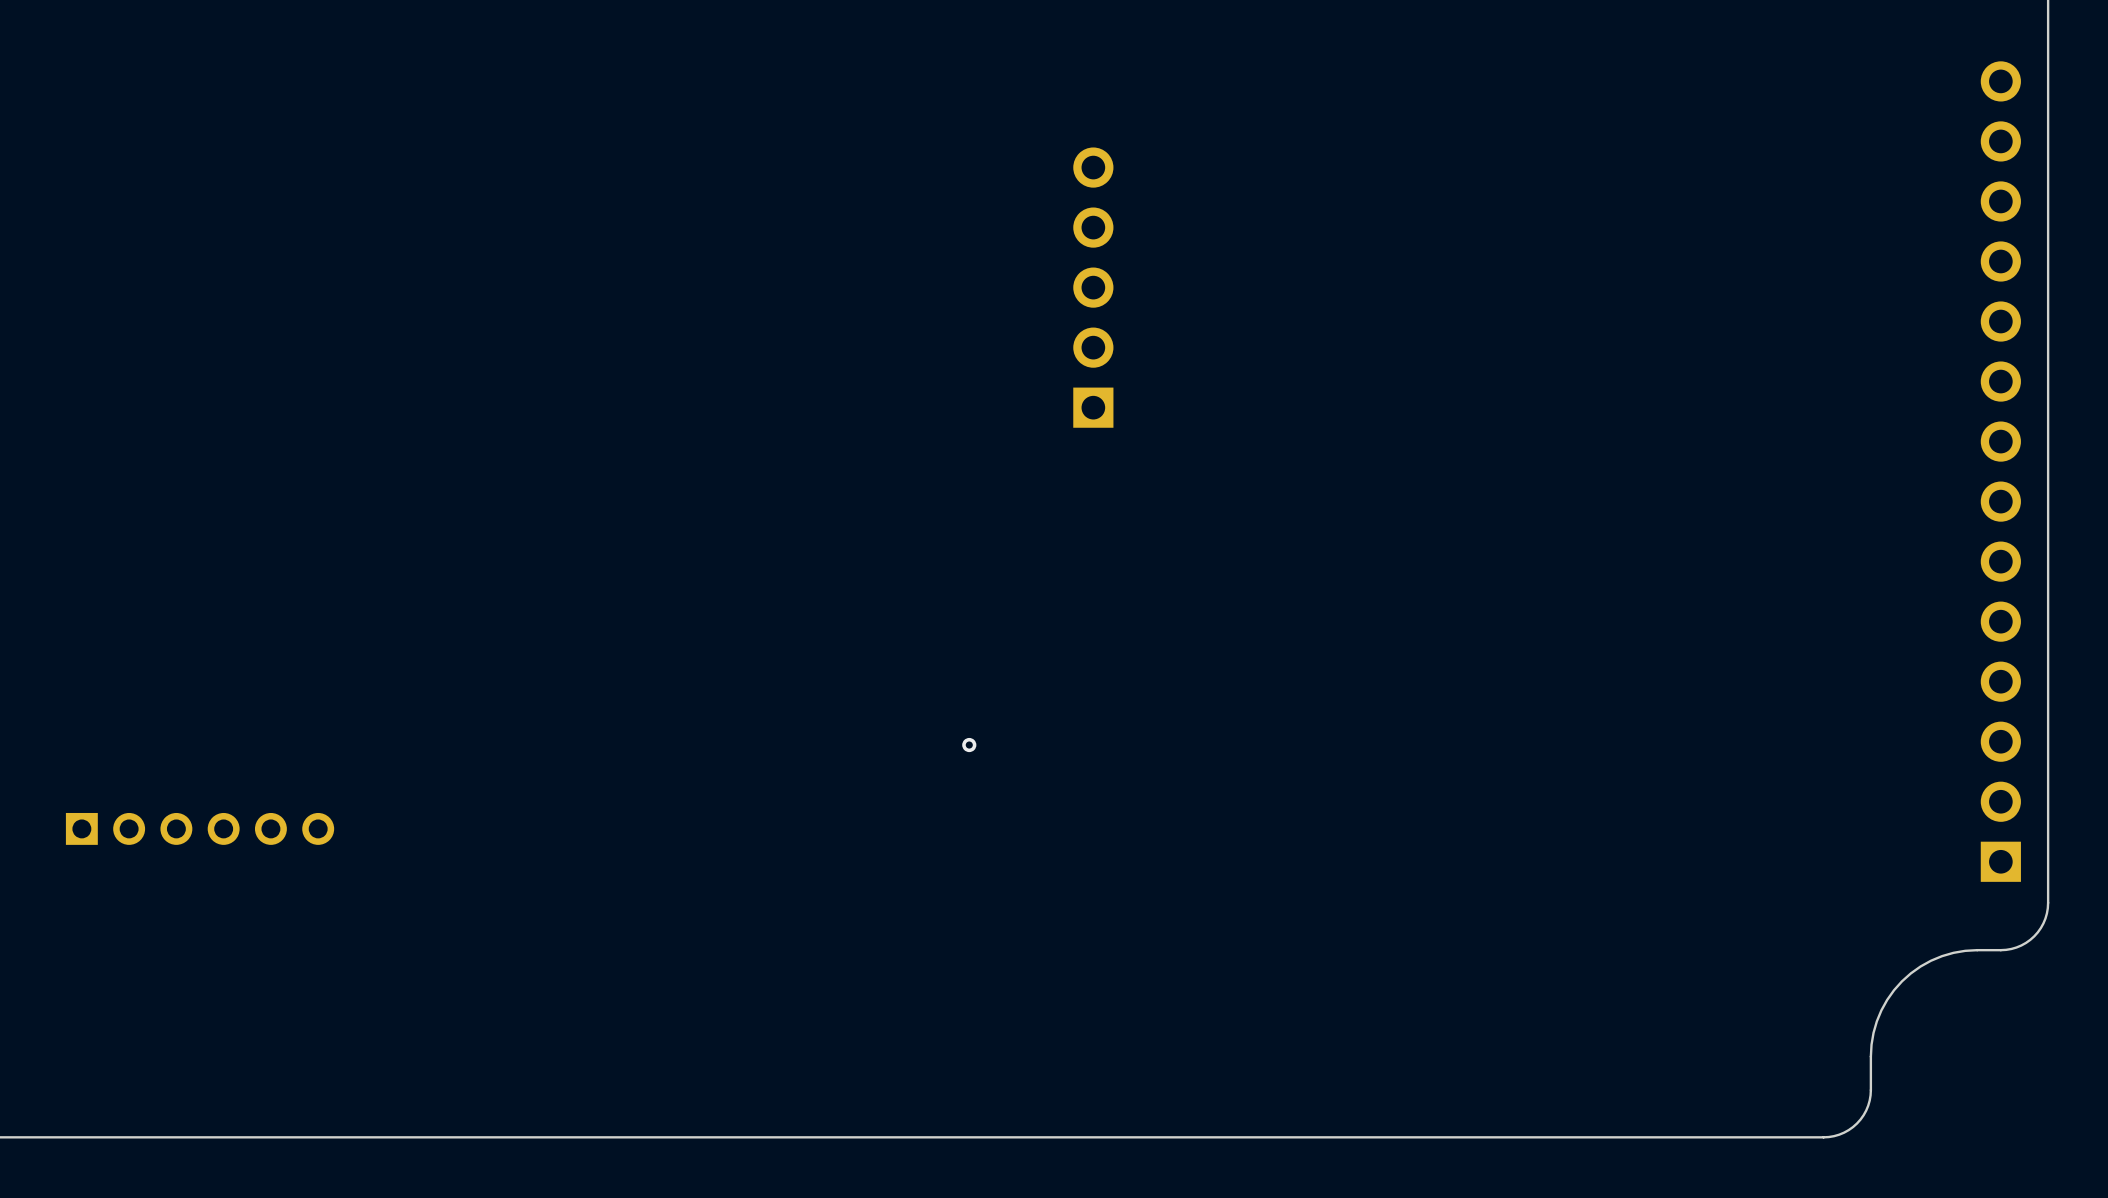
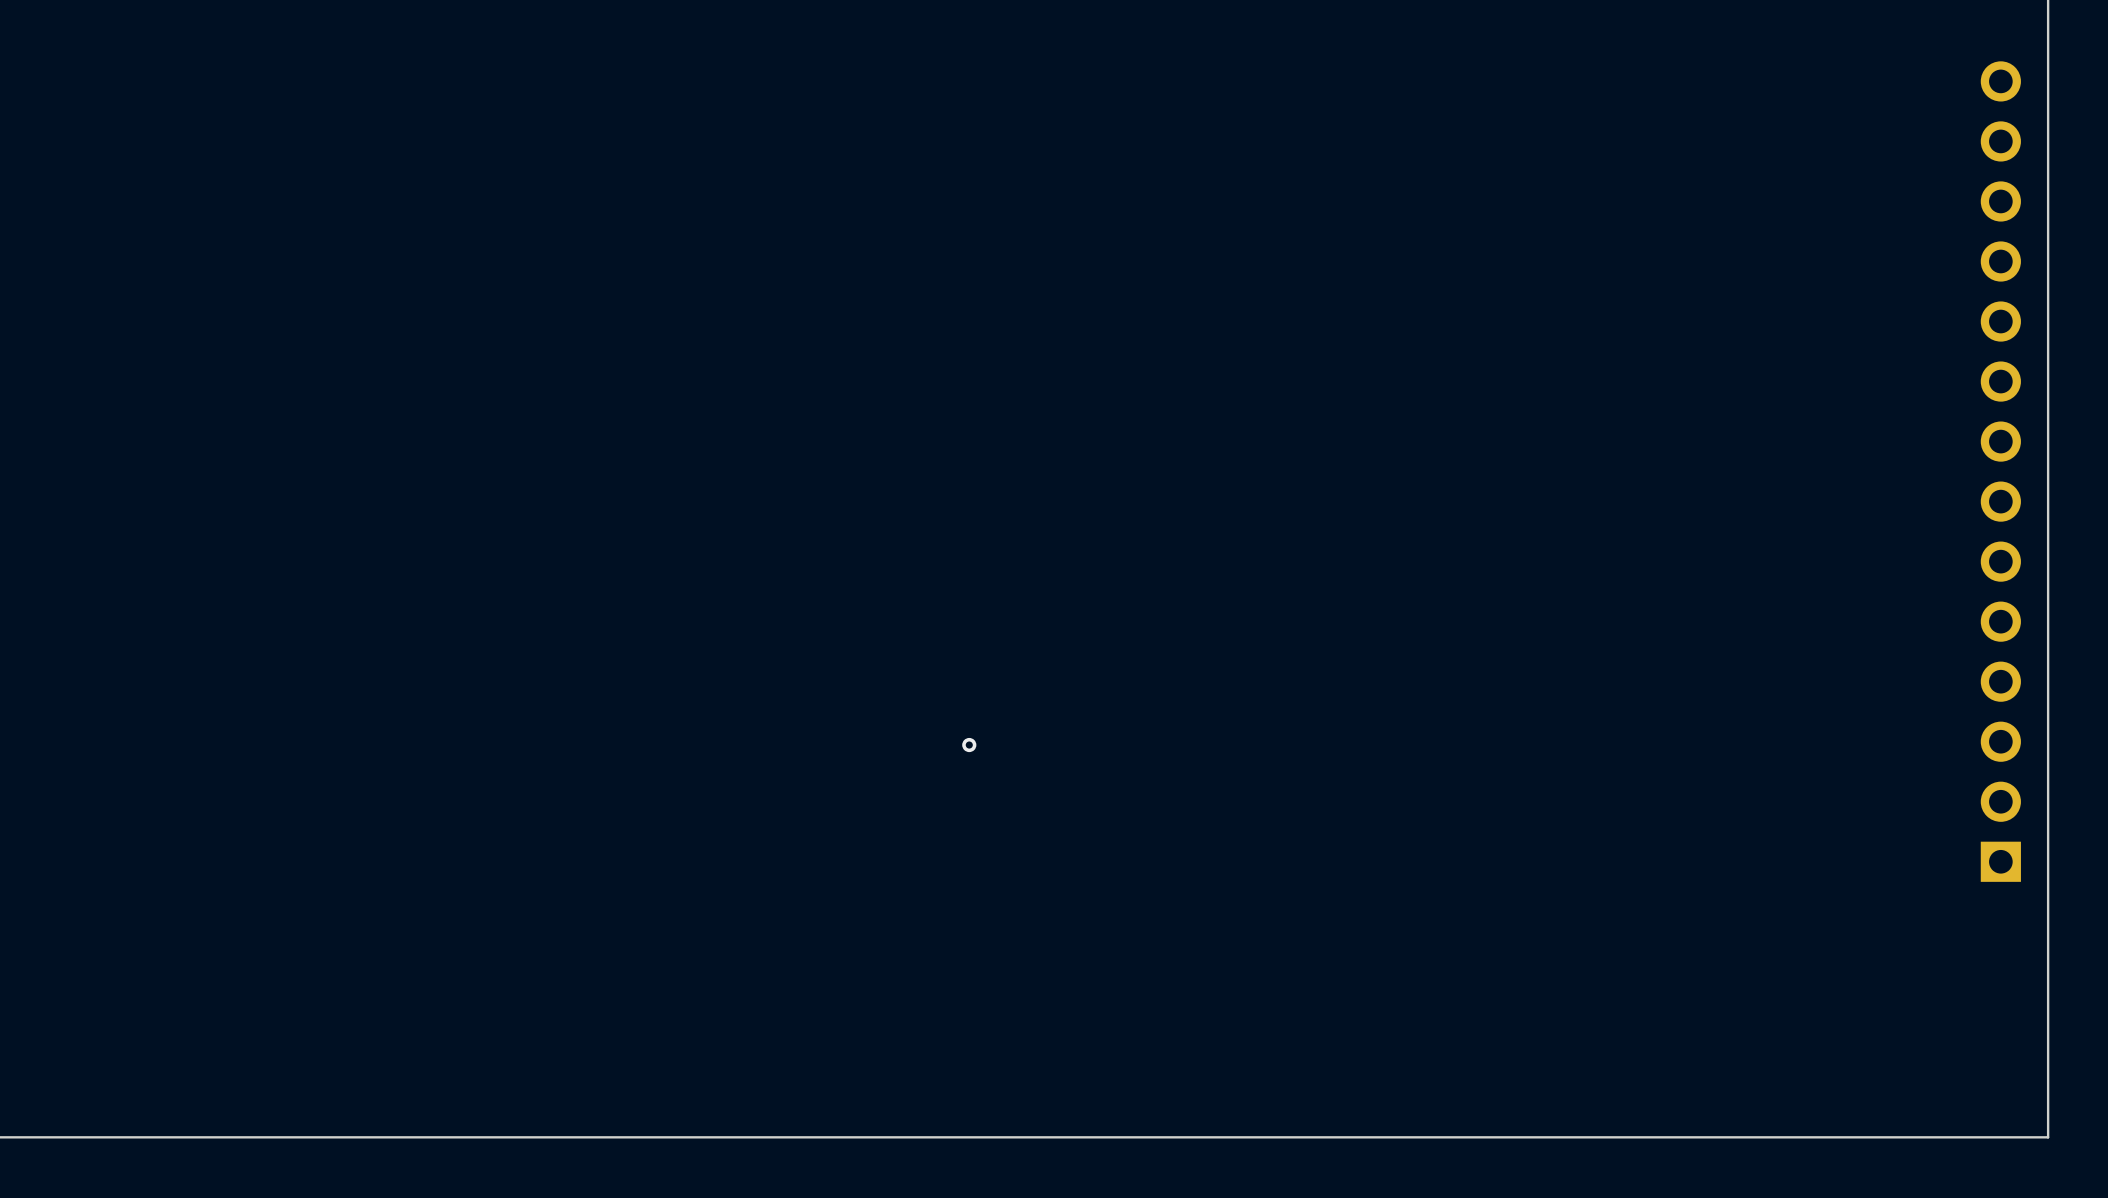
part: (1093, 287) -> none
part: (200, 828) -> none
board edge: (2048, 902) (2046, 913) (2040, 928) (2030, 939) (2021, 945) (2006, 949) (1965, 950) (1942, 956) (1920, 966) (1902, 981) (1881, 1010) (1873, 1032) (1870, 1056) (1870, 1095) (1866, 1110) (1857, 1123) (1848, 1130) (1834, 1136) (1823, 1137) -> (2048, 902) (2048, 1137) (1823, 1137)

